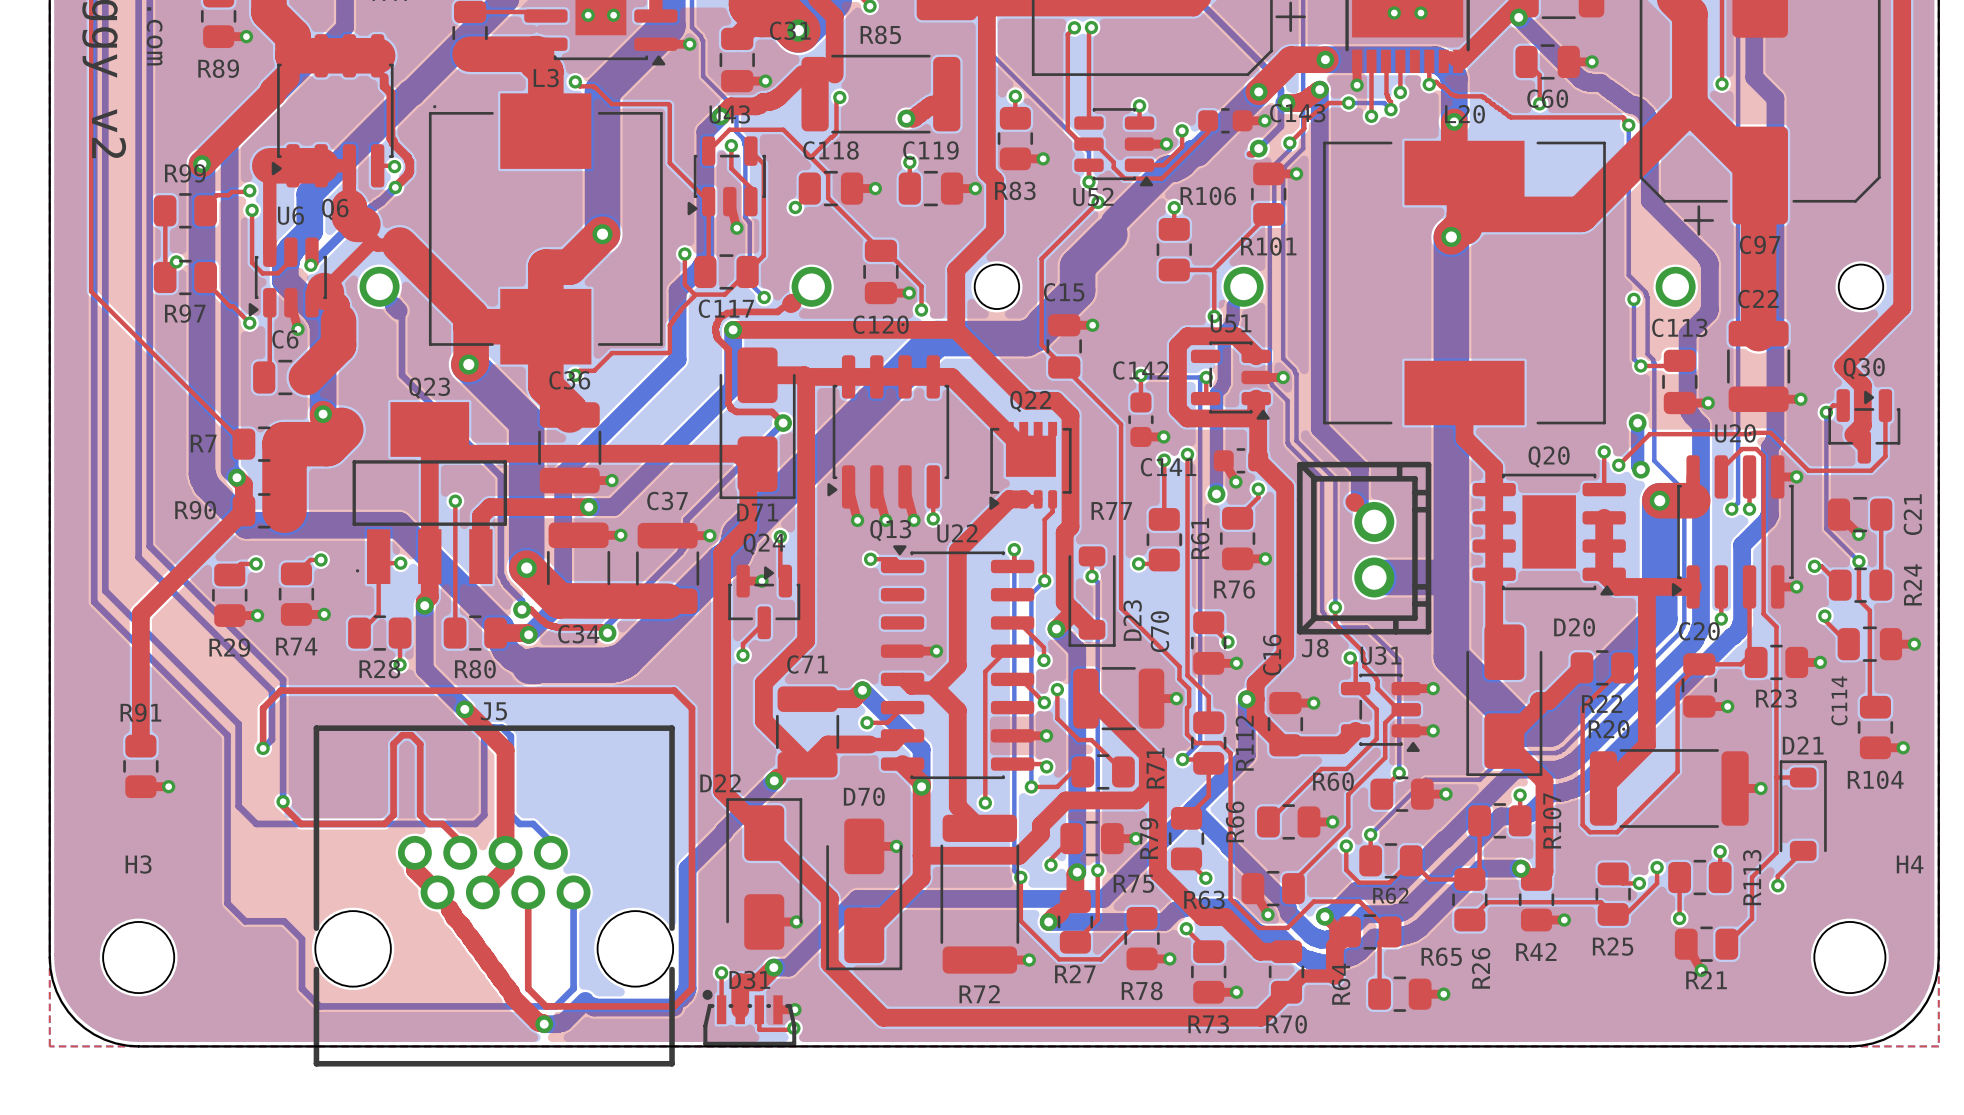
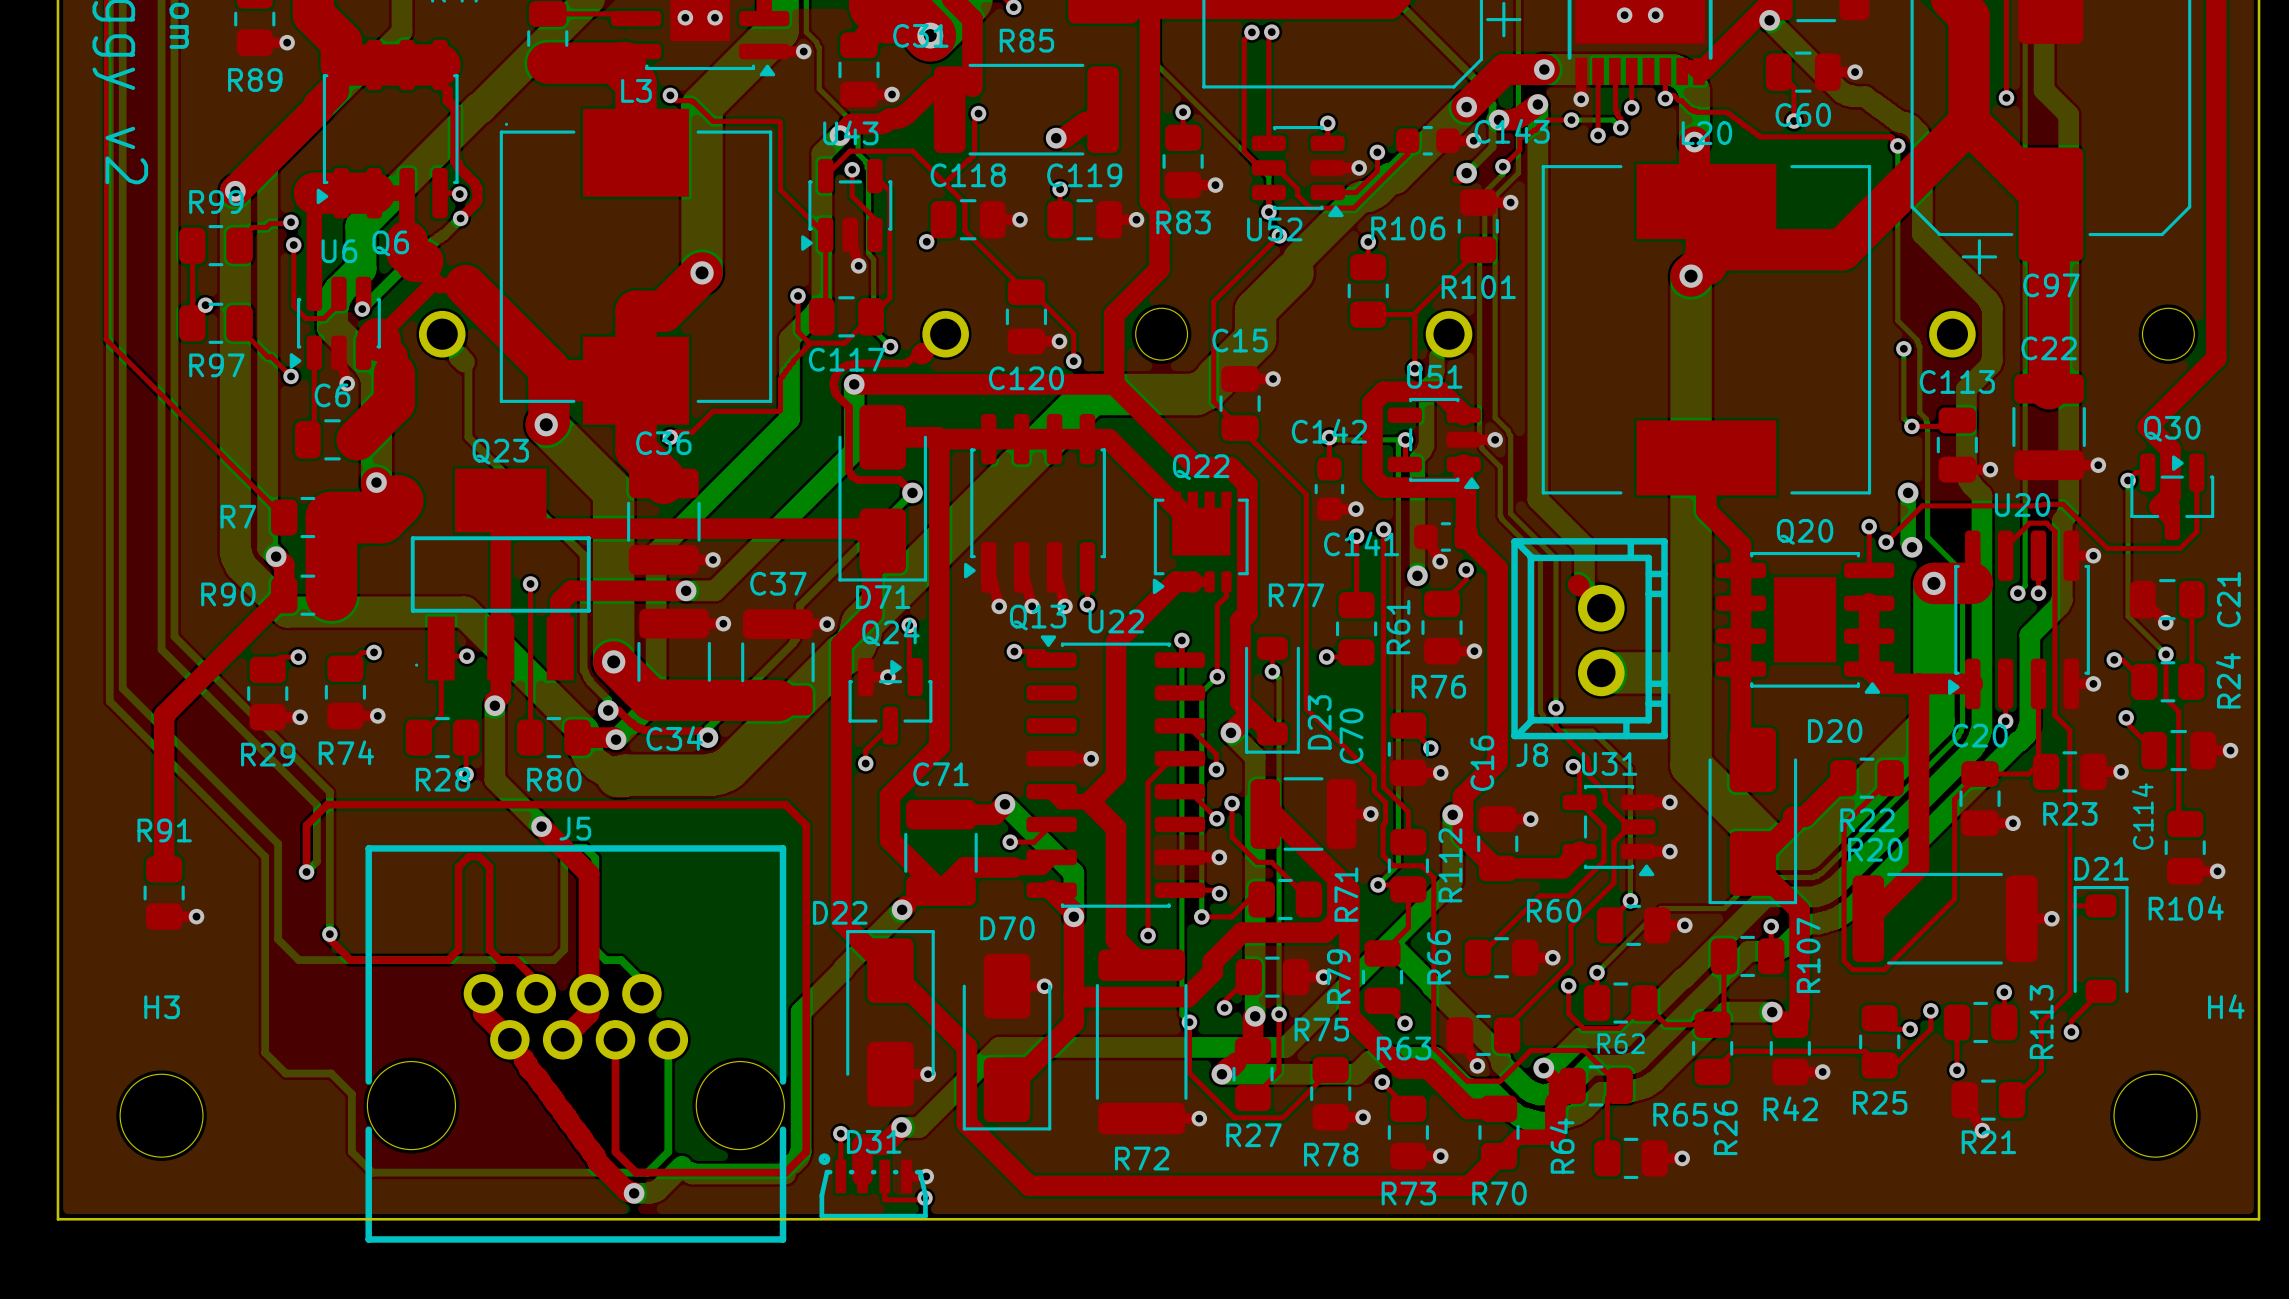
board edge: (49, 957) (52, 980) (56, 991) (68, 1011) (75, 1020) (84, 1028) (104, 1039) (115, 1043) (138, 1046) -> (57, 1115) (57, 1219) (161, 1219)
board edge: (1938, 957) (1938, 969) (1932, 991) (1920, 1011) (1912, 1020) (1903, 1028) (1883, 1039) (1861, 1045) (1849, 1046) -> (2259, 1115) (2259, 1219) (2155, 1219)

